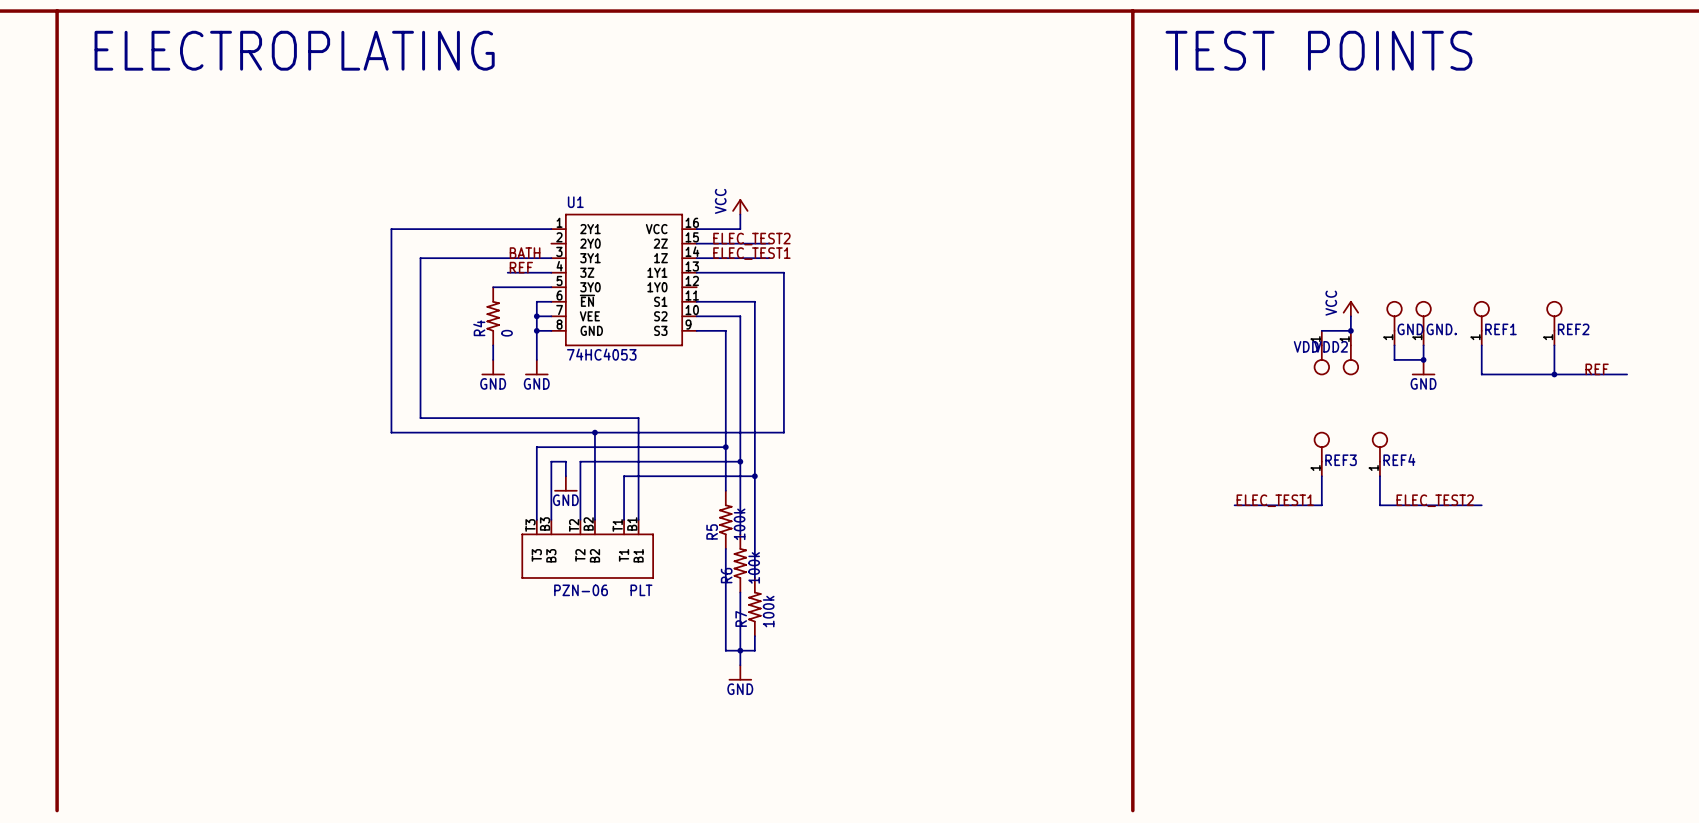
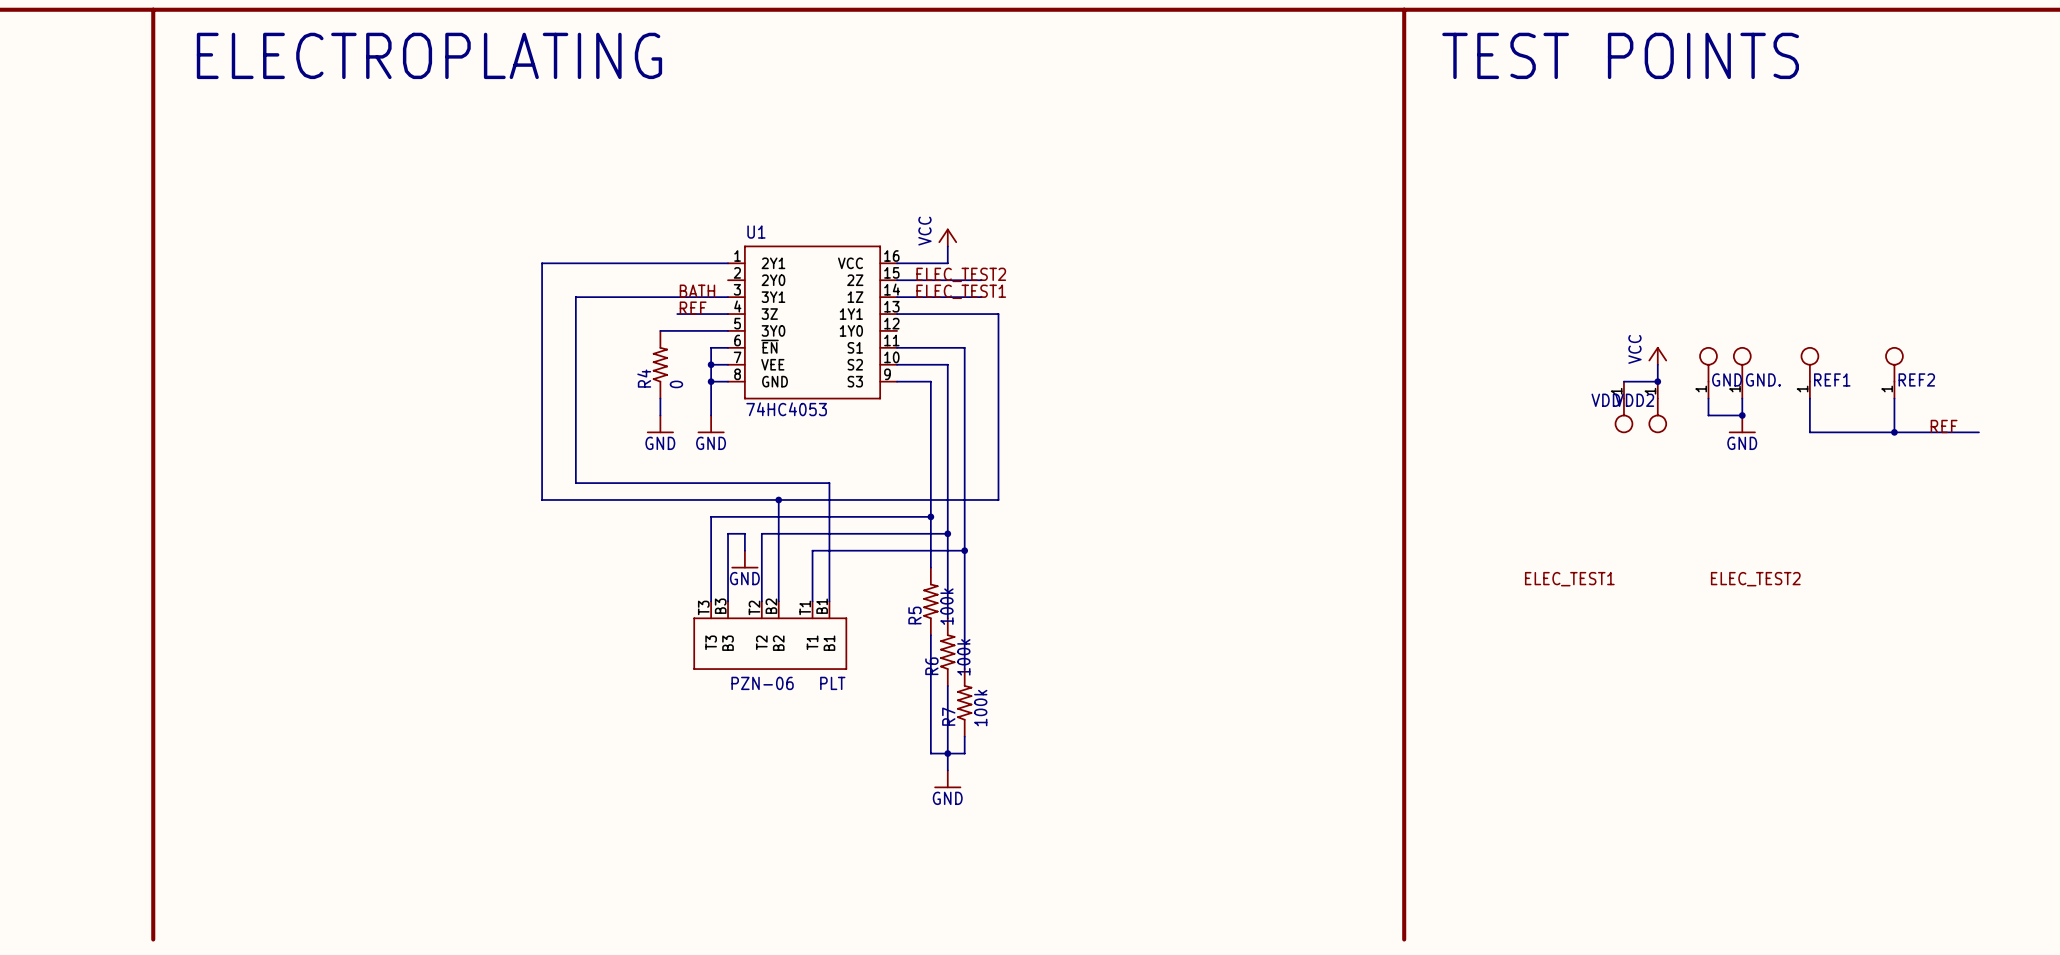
REF3: (1321, 454) -> none
REF4: (1379, 454) -> none
wire: (1321, 476) (1321, 505) (1234, 505) -> none
wire: (1379, 476) (1379, 505) (1481, 505) -> none

